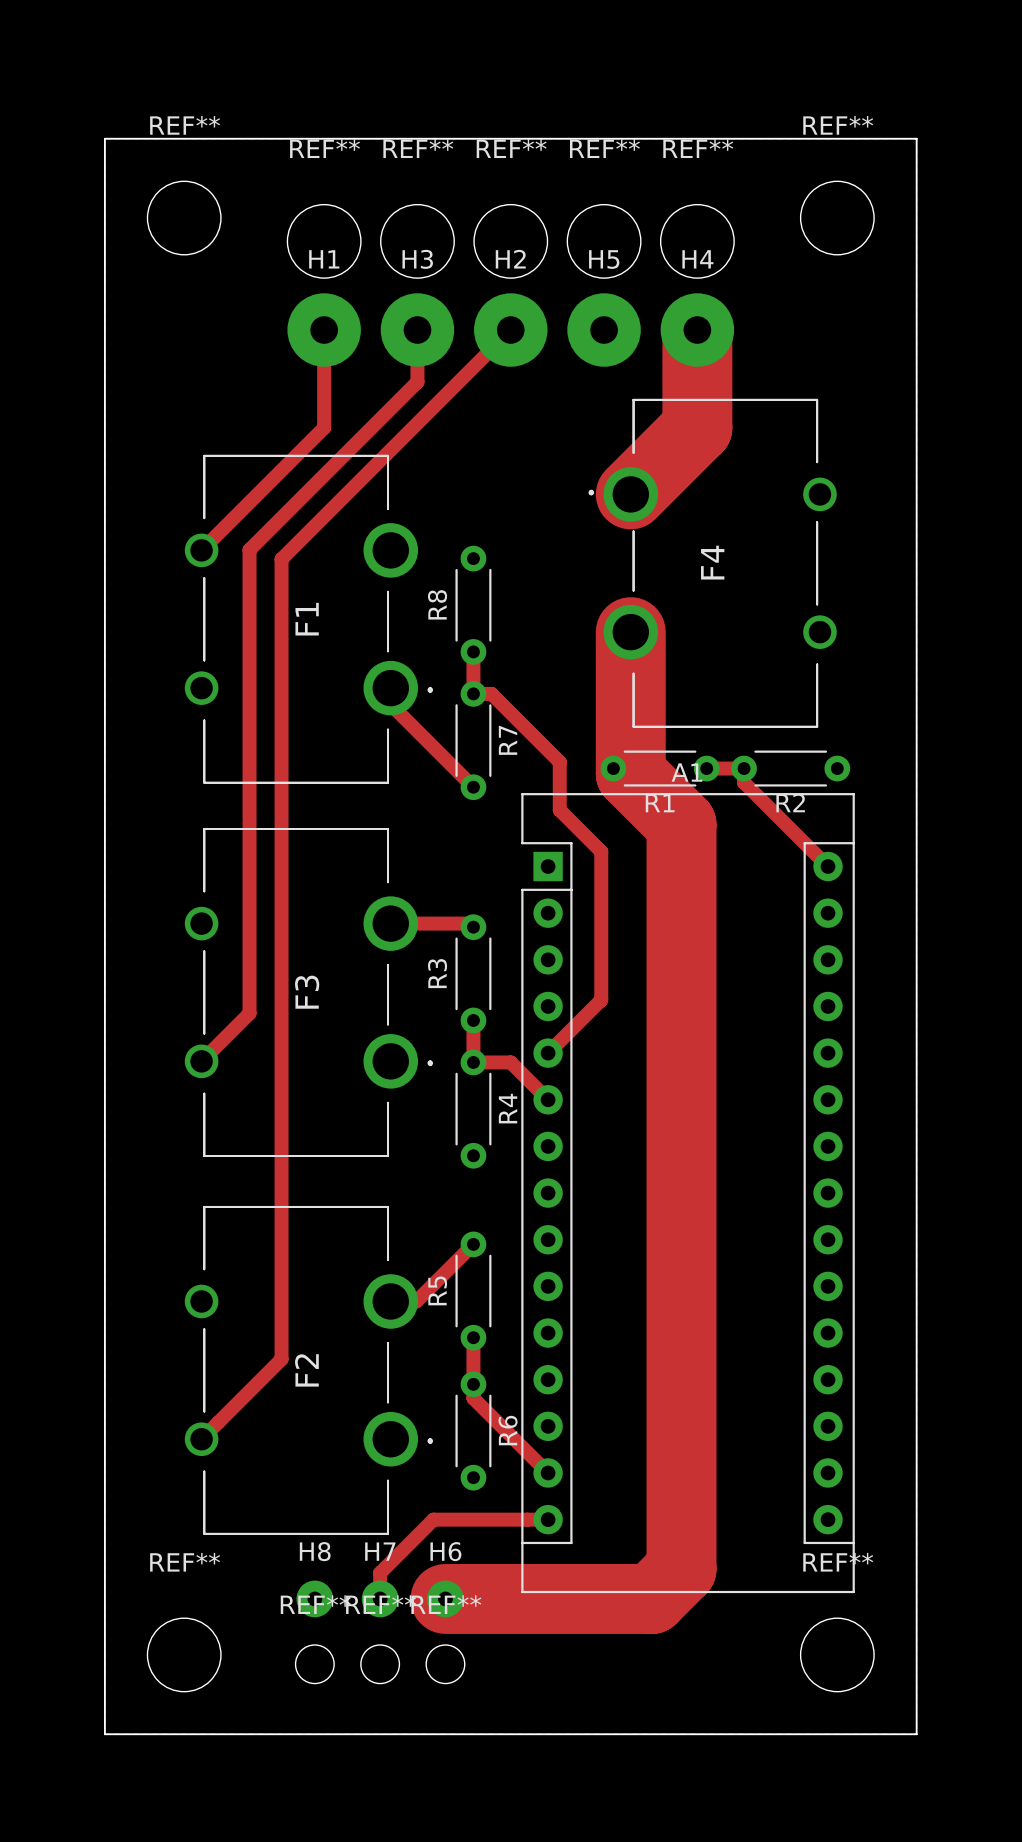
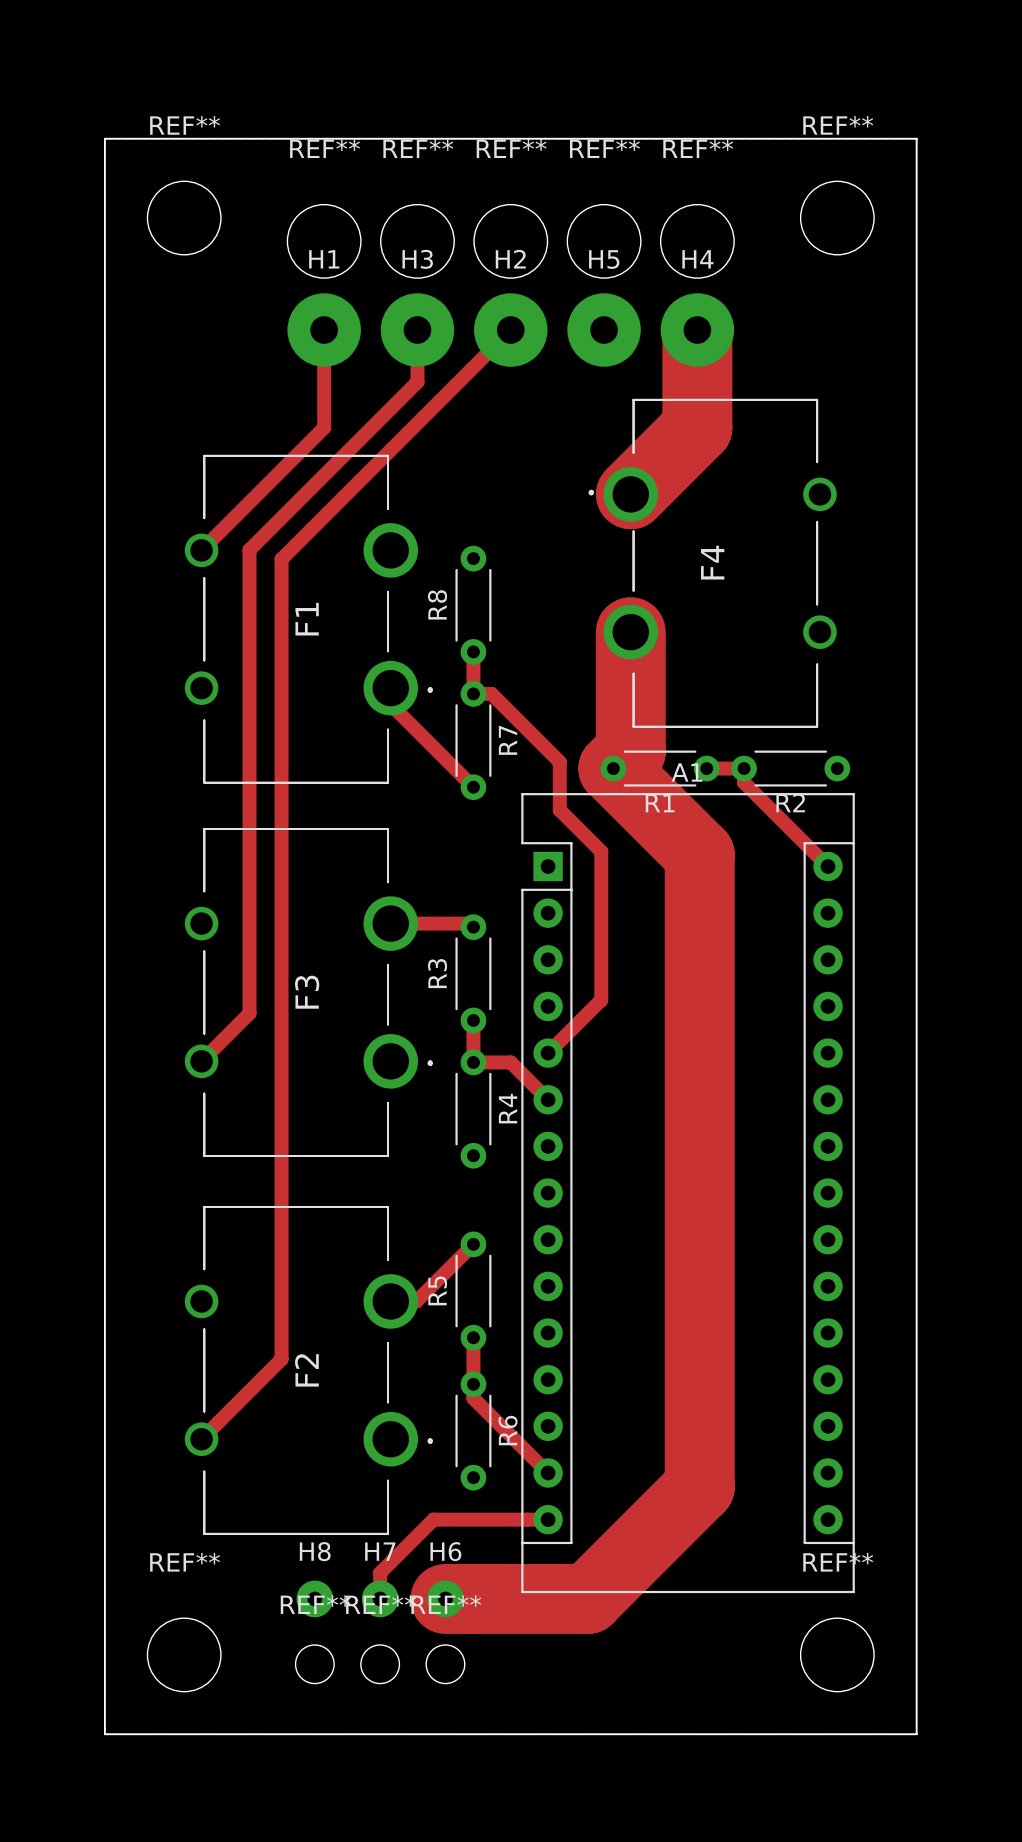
track: (630, 751) (630, 773) (681, 824) (681, 1569) (651, 1598) (587, 1598) -> (630, 751) (613, 768) (699, 854) (699, 1486) (587, 1598)

